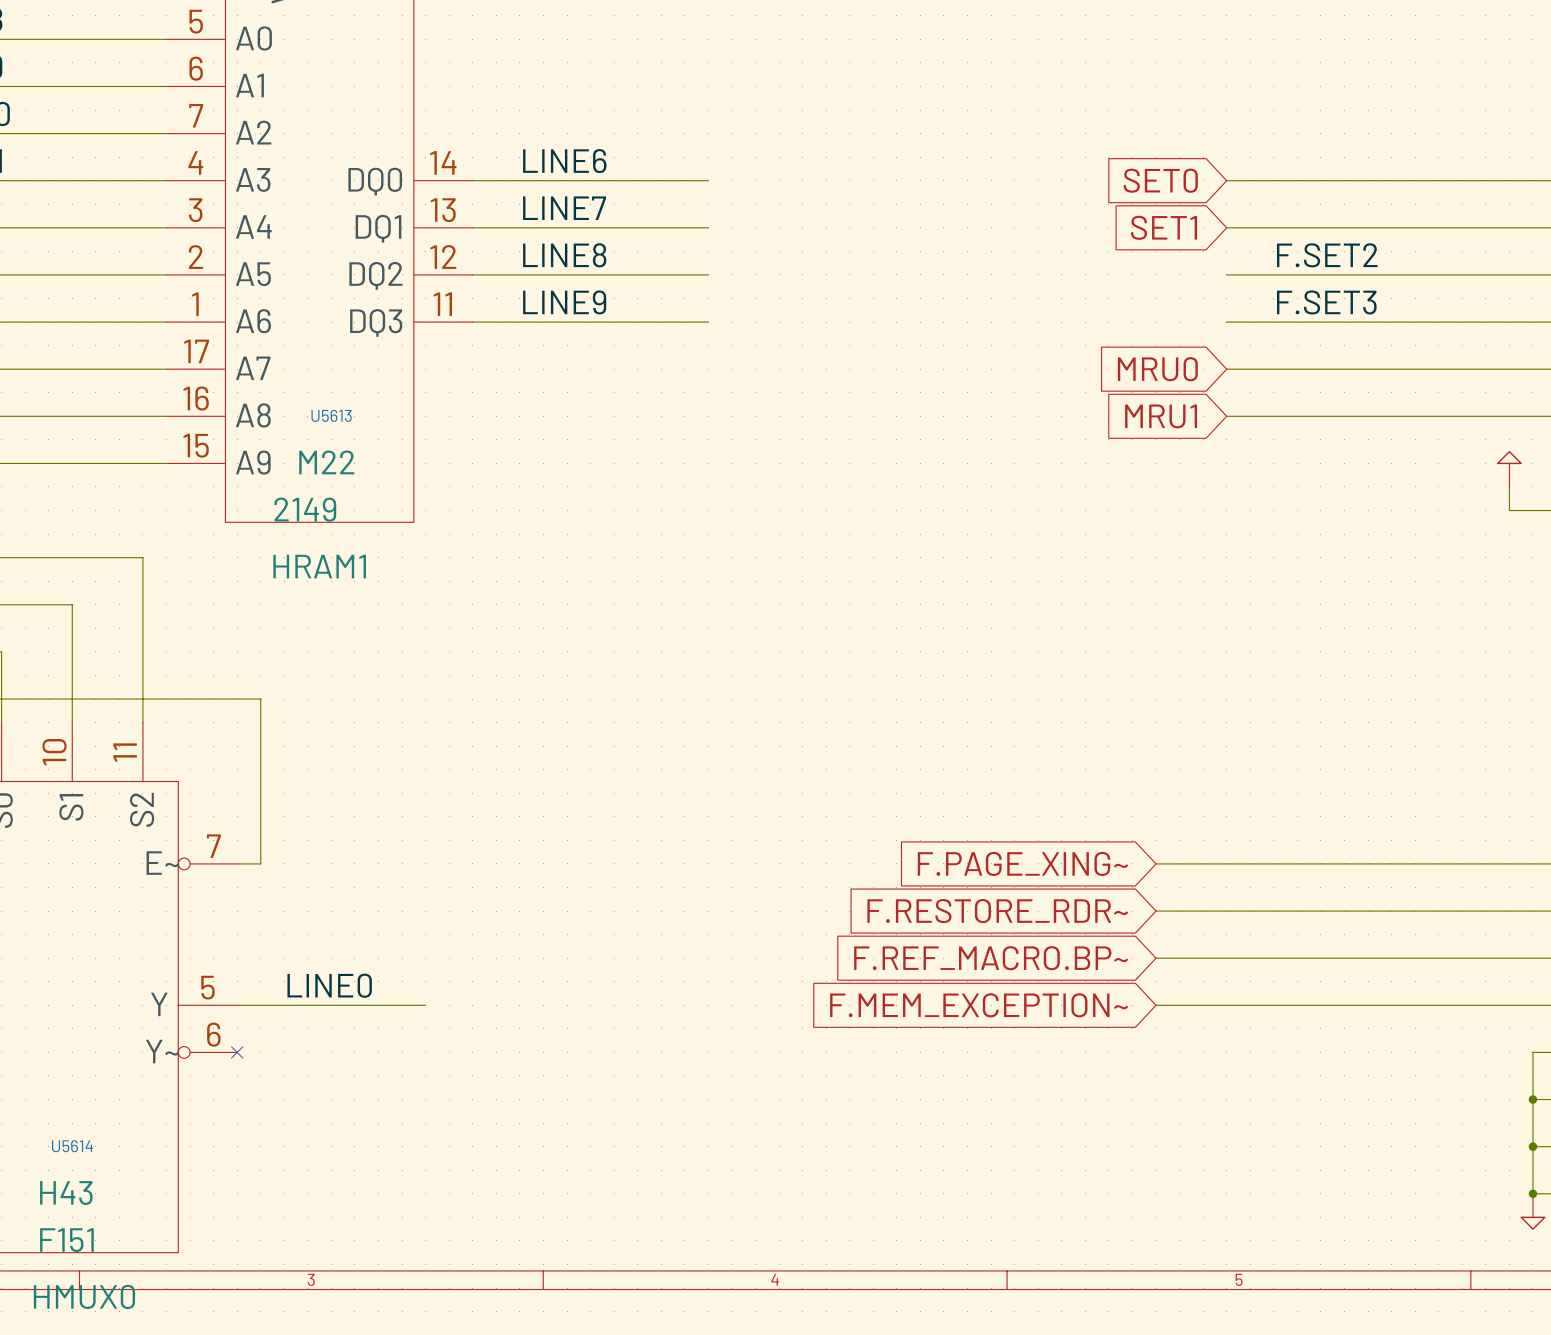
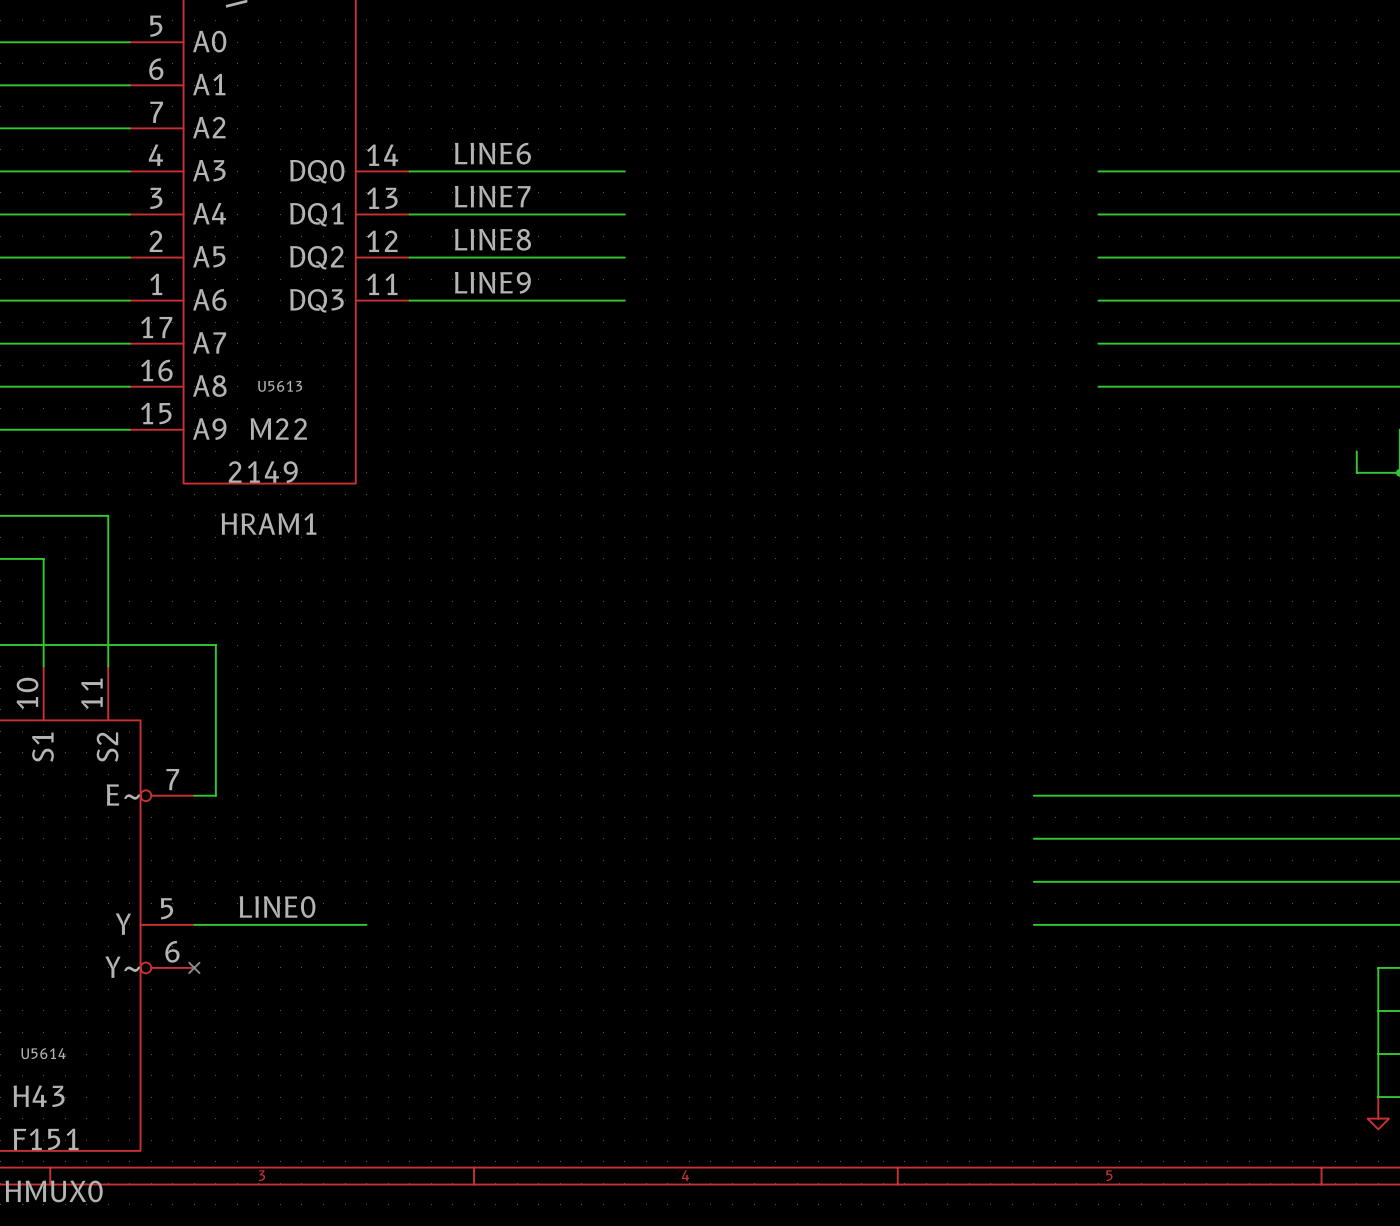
global label: SET0 (1160, 180) -> none
global label: SET1 (1164, 227) -> none
label: F.SET2 (1327, 255) -> none
label: F.SET3 (1326, 302) -> none
global label: MRU0 (1157, 369) -> none
global label: MRU1 (1161, 416) -> none
power symbol: (1509, 468) -> none
global label: F.PAGE_XING~ (1022, 863) -> none
global label: F.RESTORE_RDR~ (997, 911) -> none
global label: F.REF_MACRO.BP~ (991, 958) -> none
global label: F.MEM_EXCEPTION~ (979, 1005) -> none
junction: (1532, 1099) -> none
junction: (1532, 1146) -> none
junction: (1532, 1193) -> none

